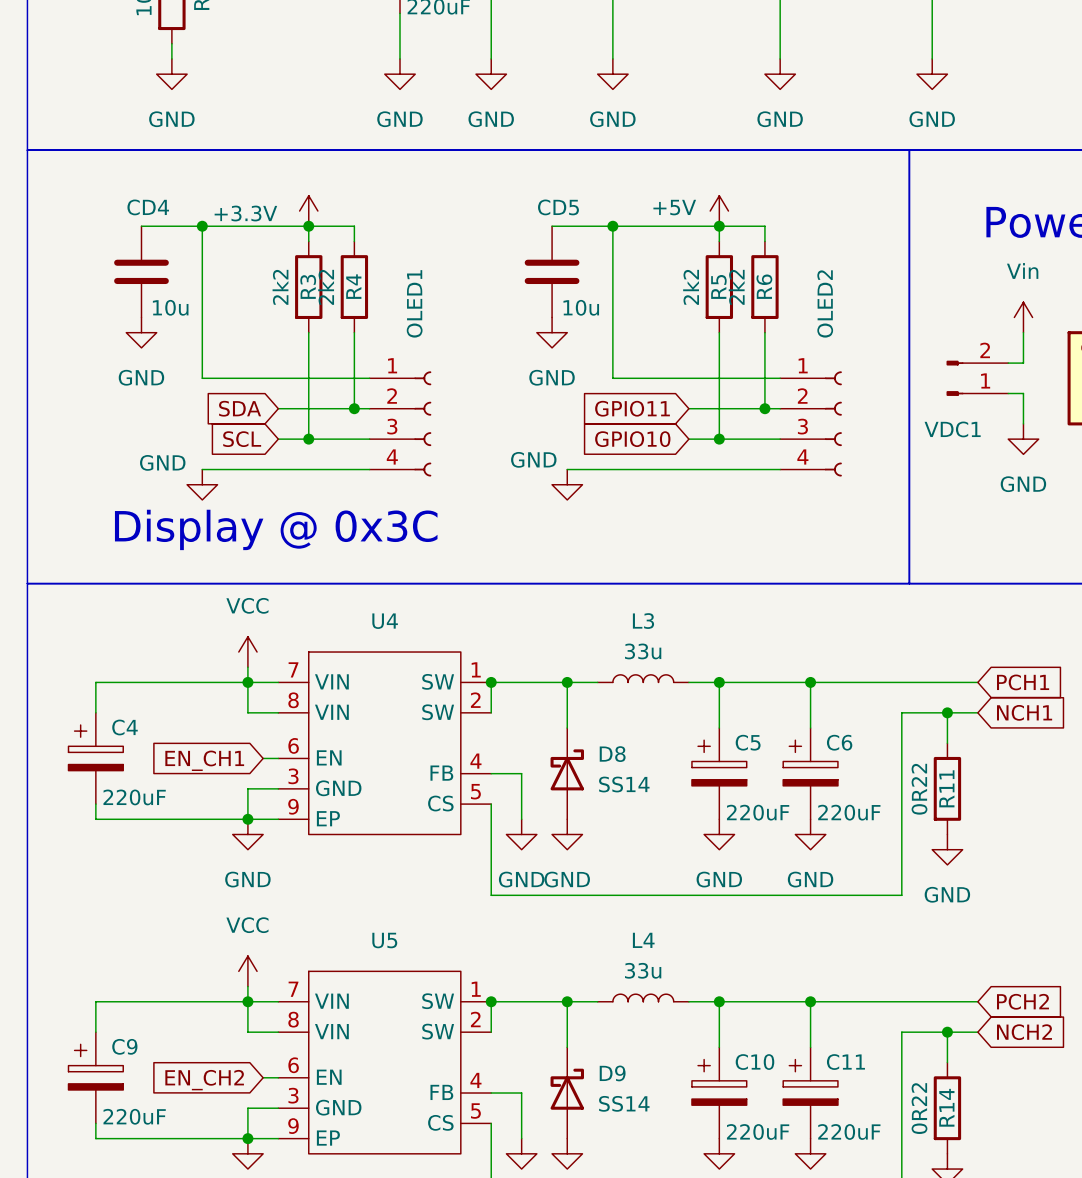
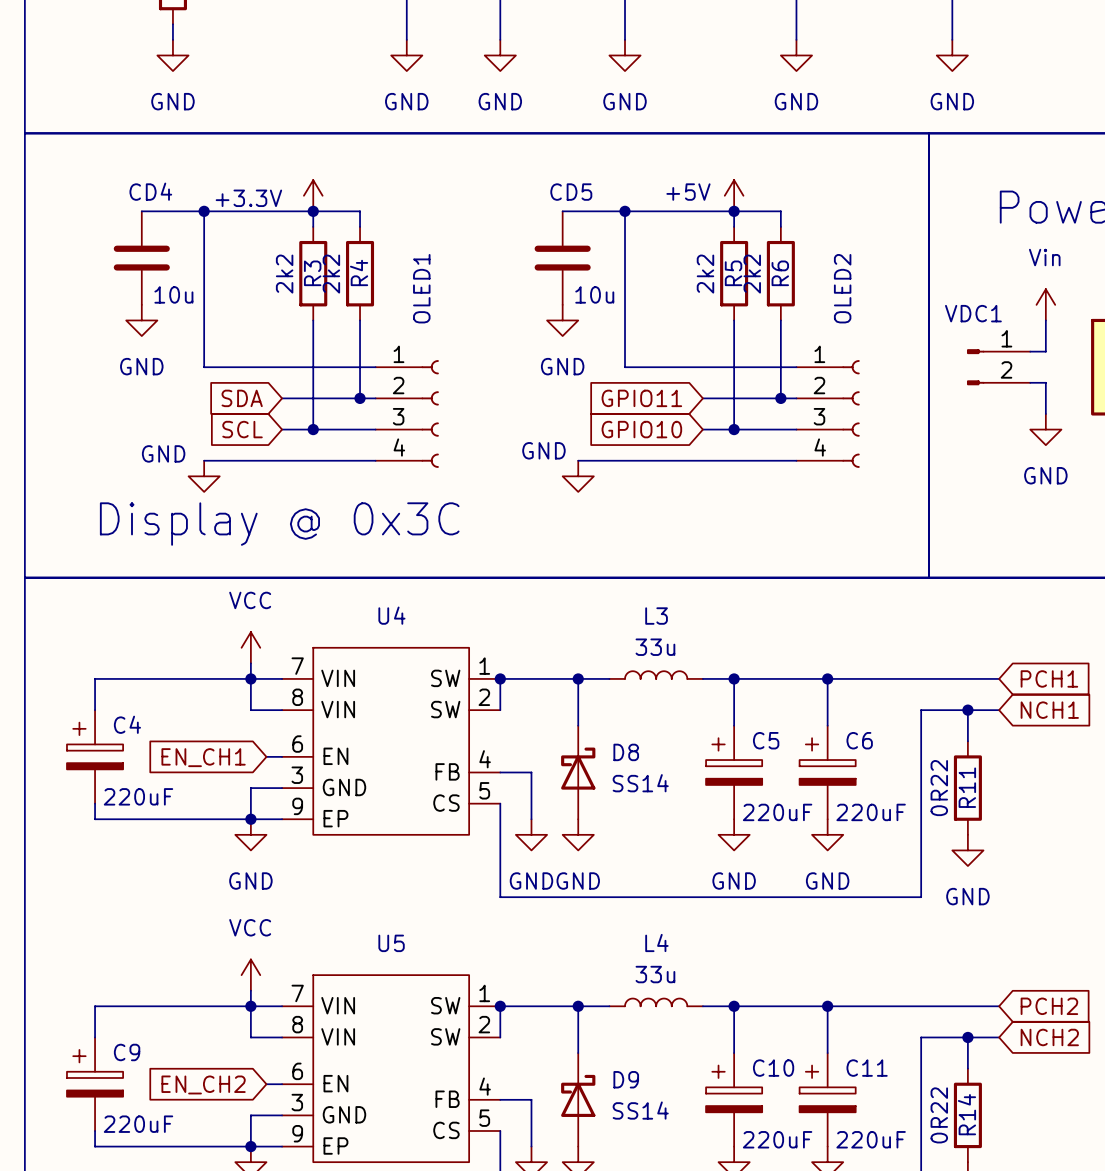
VDC1 flip: as is (955, 378) -> up-down (975, 367)

